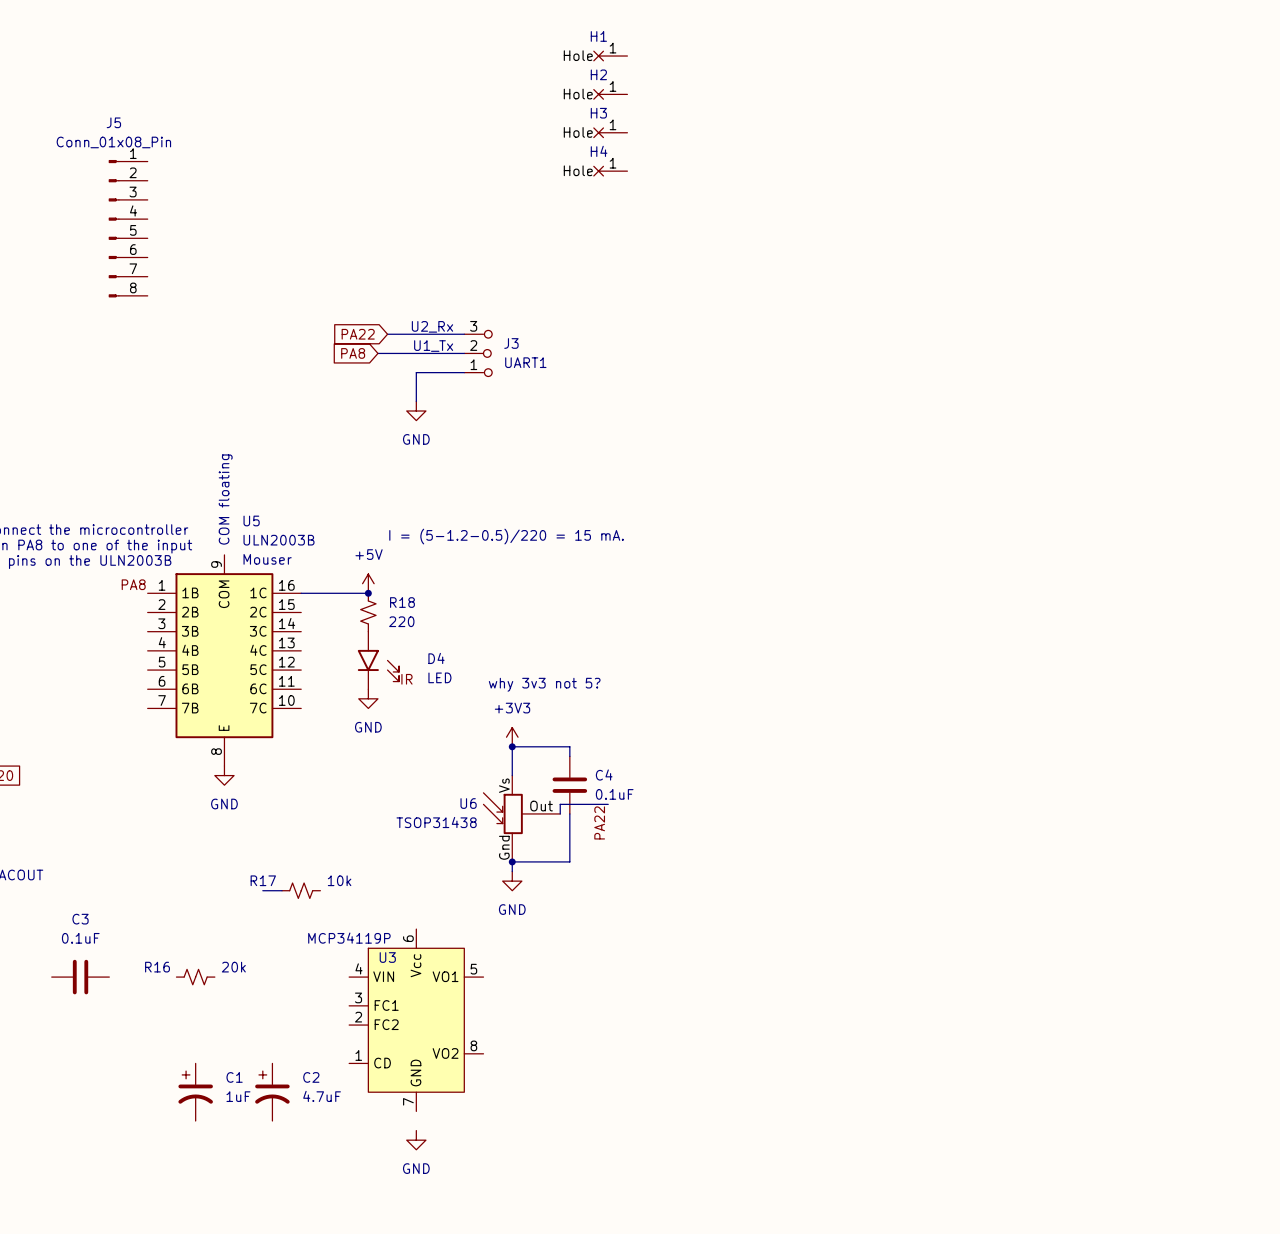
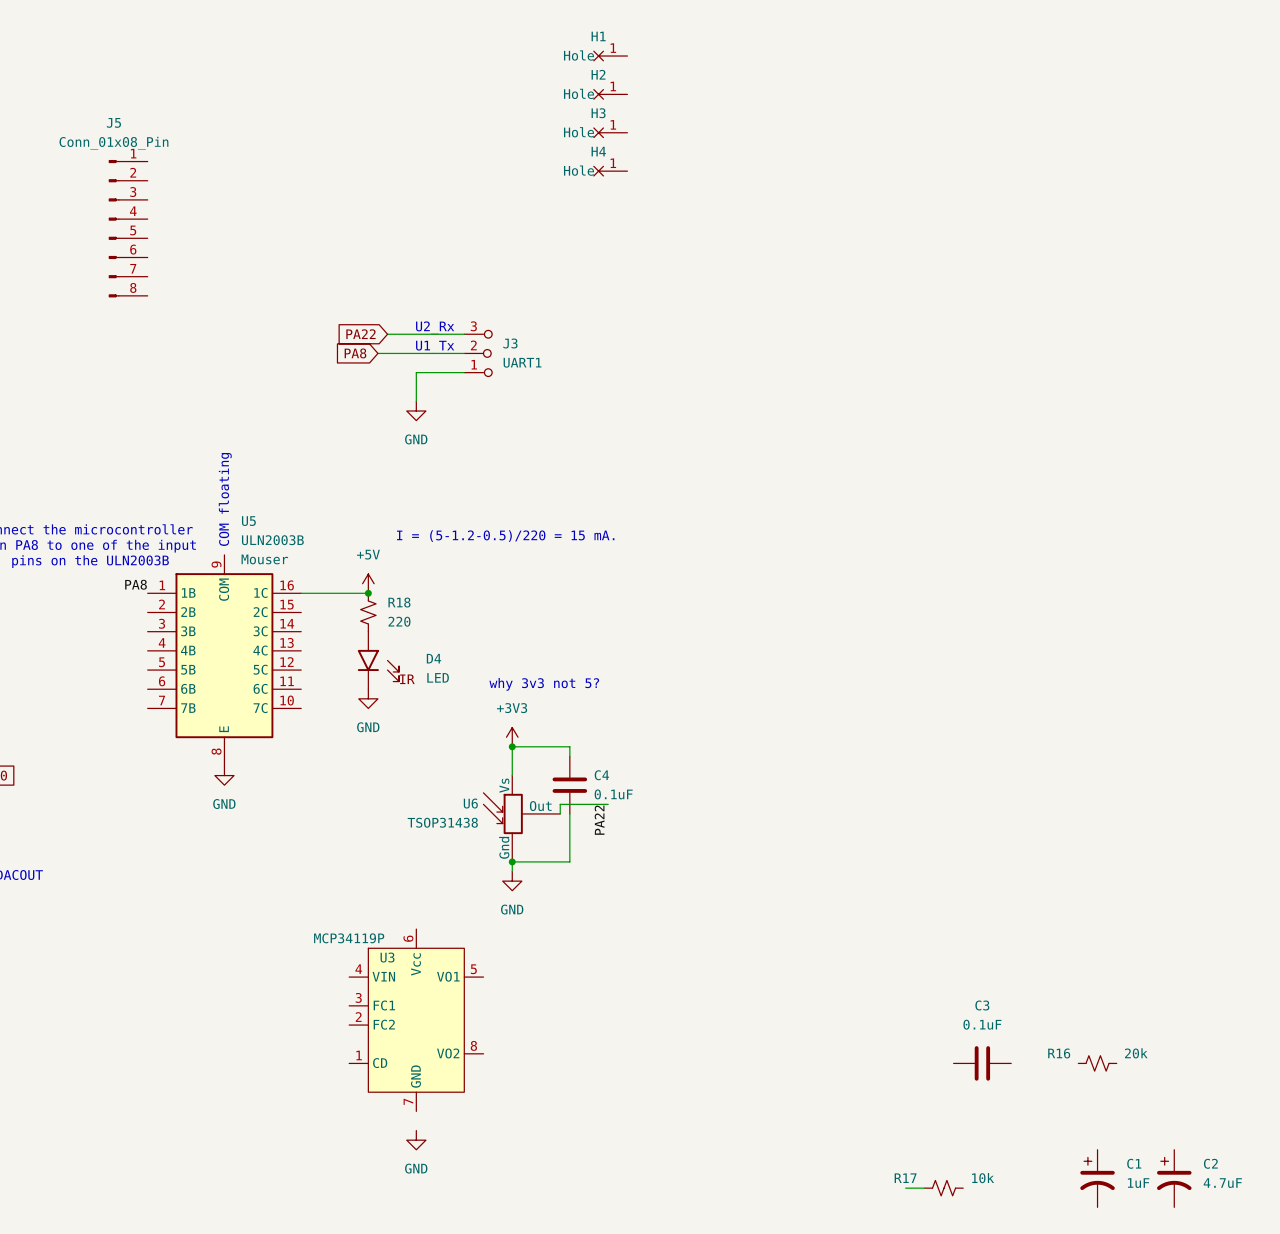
wire: (262, 890) (282, 890) -> none
R17 position: (301, 890) -> (944, 1188)
C3 position: (80, 977) -> (982, 1063)
R16 position: (195, 977) -> (1097, 1063)
C1 position: (195, 1092) -> (1097, 1178)
C2 position: (272, 1092) -> (1174, 1178)
wire: none -> (905, 1188) (924, 1188)

